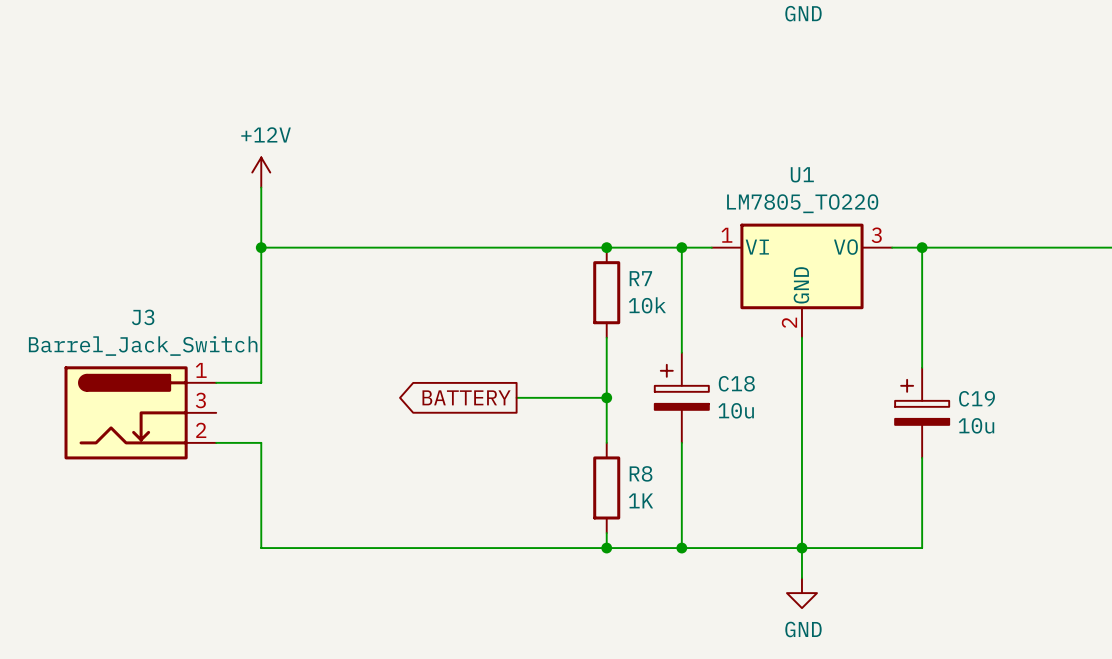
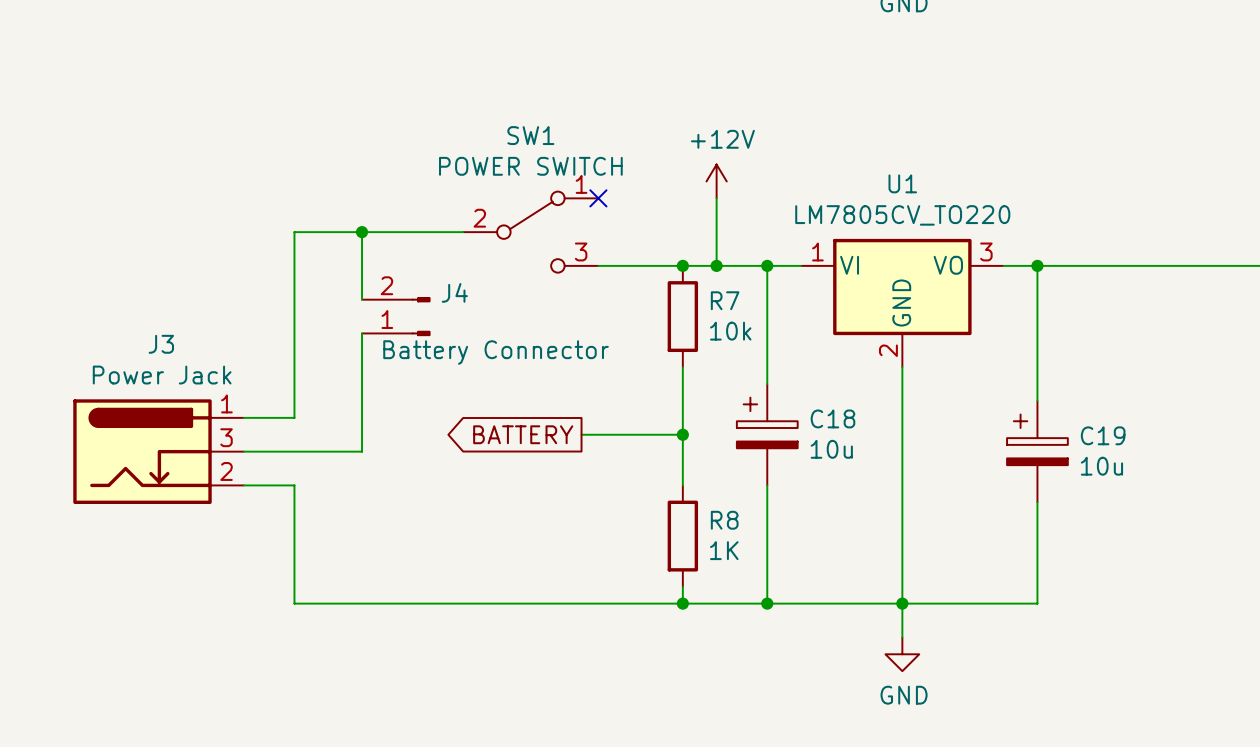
power symbol: +12V (261, 172) -> none
power symbol: none -> +12V (716, 181)
wire: (261, 187) (261, 217) -> (463, 232) (294, 232)
no-connect mark: none -> (598, 198)
wire: none -> (716, 198) (716, 265)
U1 value: LM7805_TO220 (802, 203) -> LM7805CV_TO220 (902, 215)
wire: none -> (362, 232) (362, 299)
SW1: none -> POWER SWITCH (530, 232)
wire: (261, 247) (531, 247) -> none
junction position: (261, 247) -> (362, 232)
junction: none -> (716, 265)
J4: none -> Battery Connector (396, 316)
wire: none -> (362, 333) (362, 451) (243, 451)
J3 value: Barrel_Jack_Switch (143, 345) -> Power Jack (162, 375)

